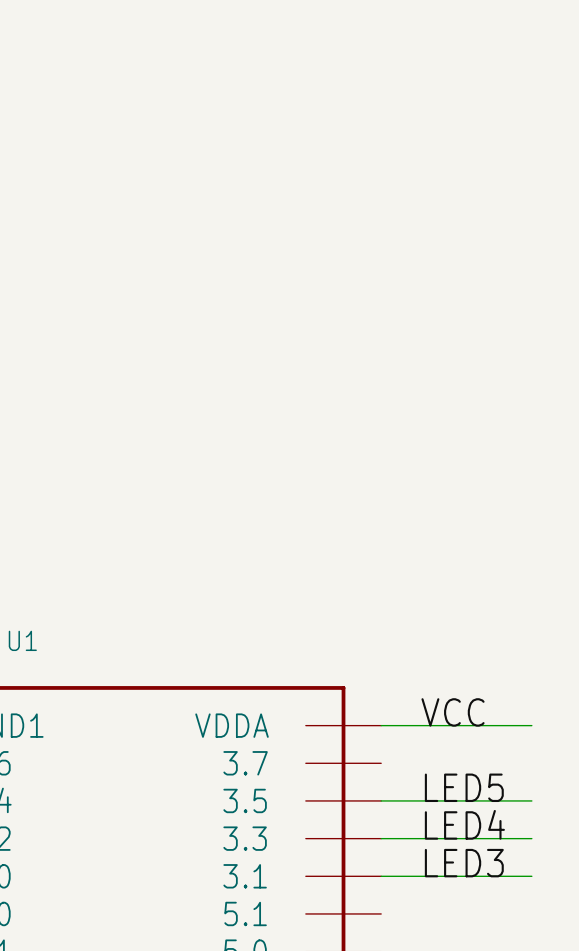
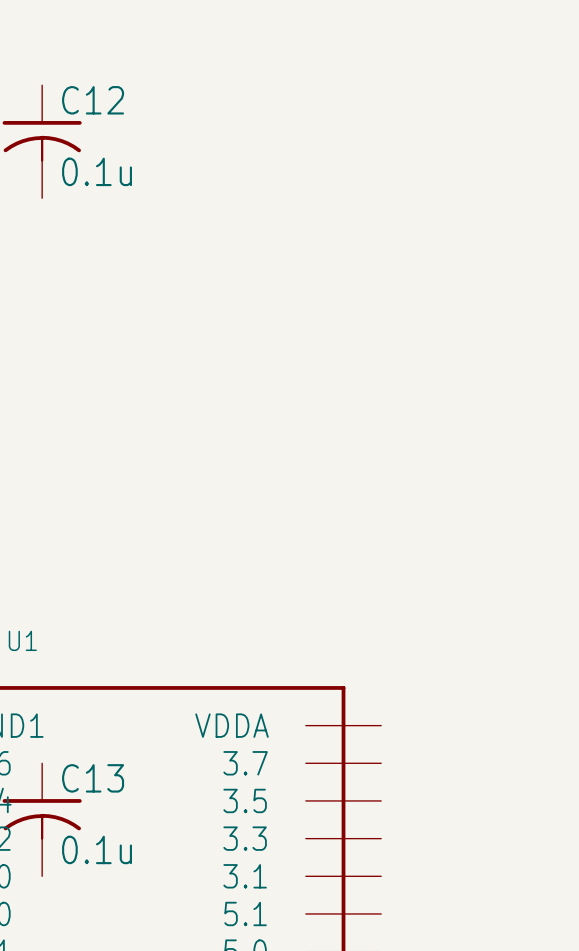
C12: none -> 0.1u (42, 141)
label: VCC (453, 712) -> none
wire: (381, 725) (531, 725) -> none
label: LED5 (464, 787) -> none
wire: (381, 800) (531, 800) -> none
C13: none -> 0.1u (42, 819)
label: LED4 (464, 824) -> none
wire: (381, 838) (531, 838) -> none
label: LED3 (464, 863) -> none
wire: (381, 876) (531, 876) -> none

